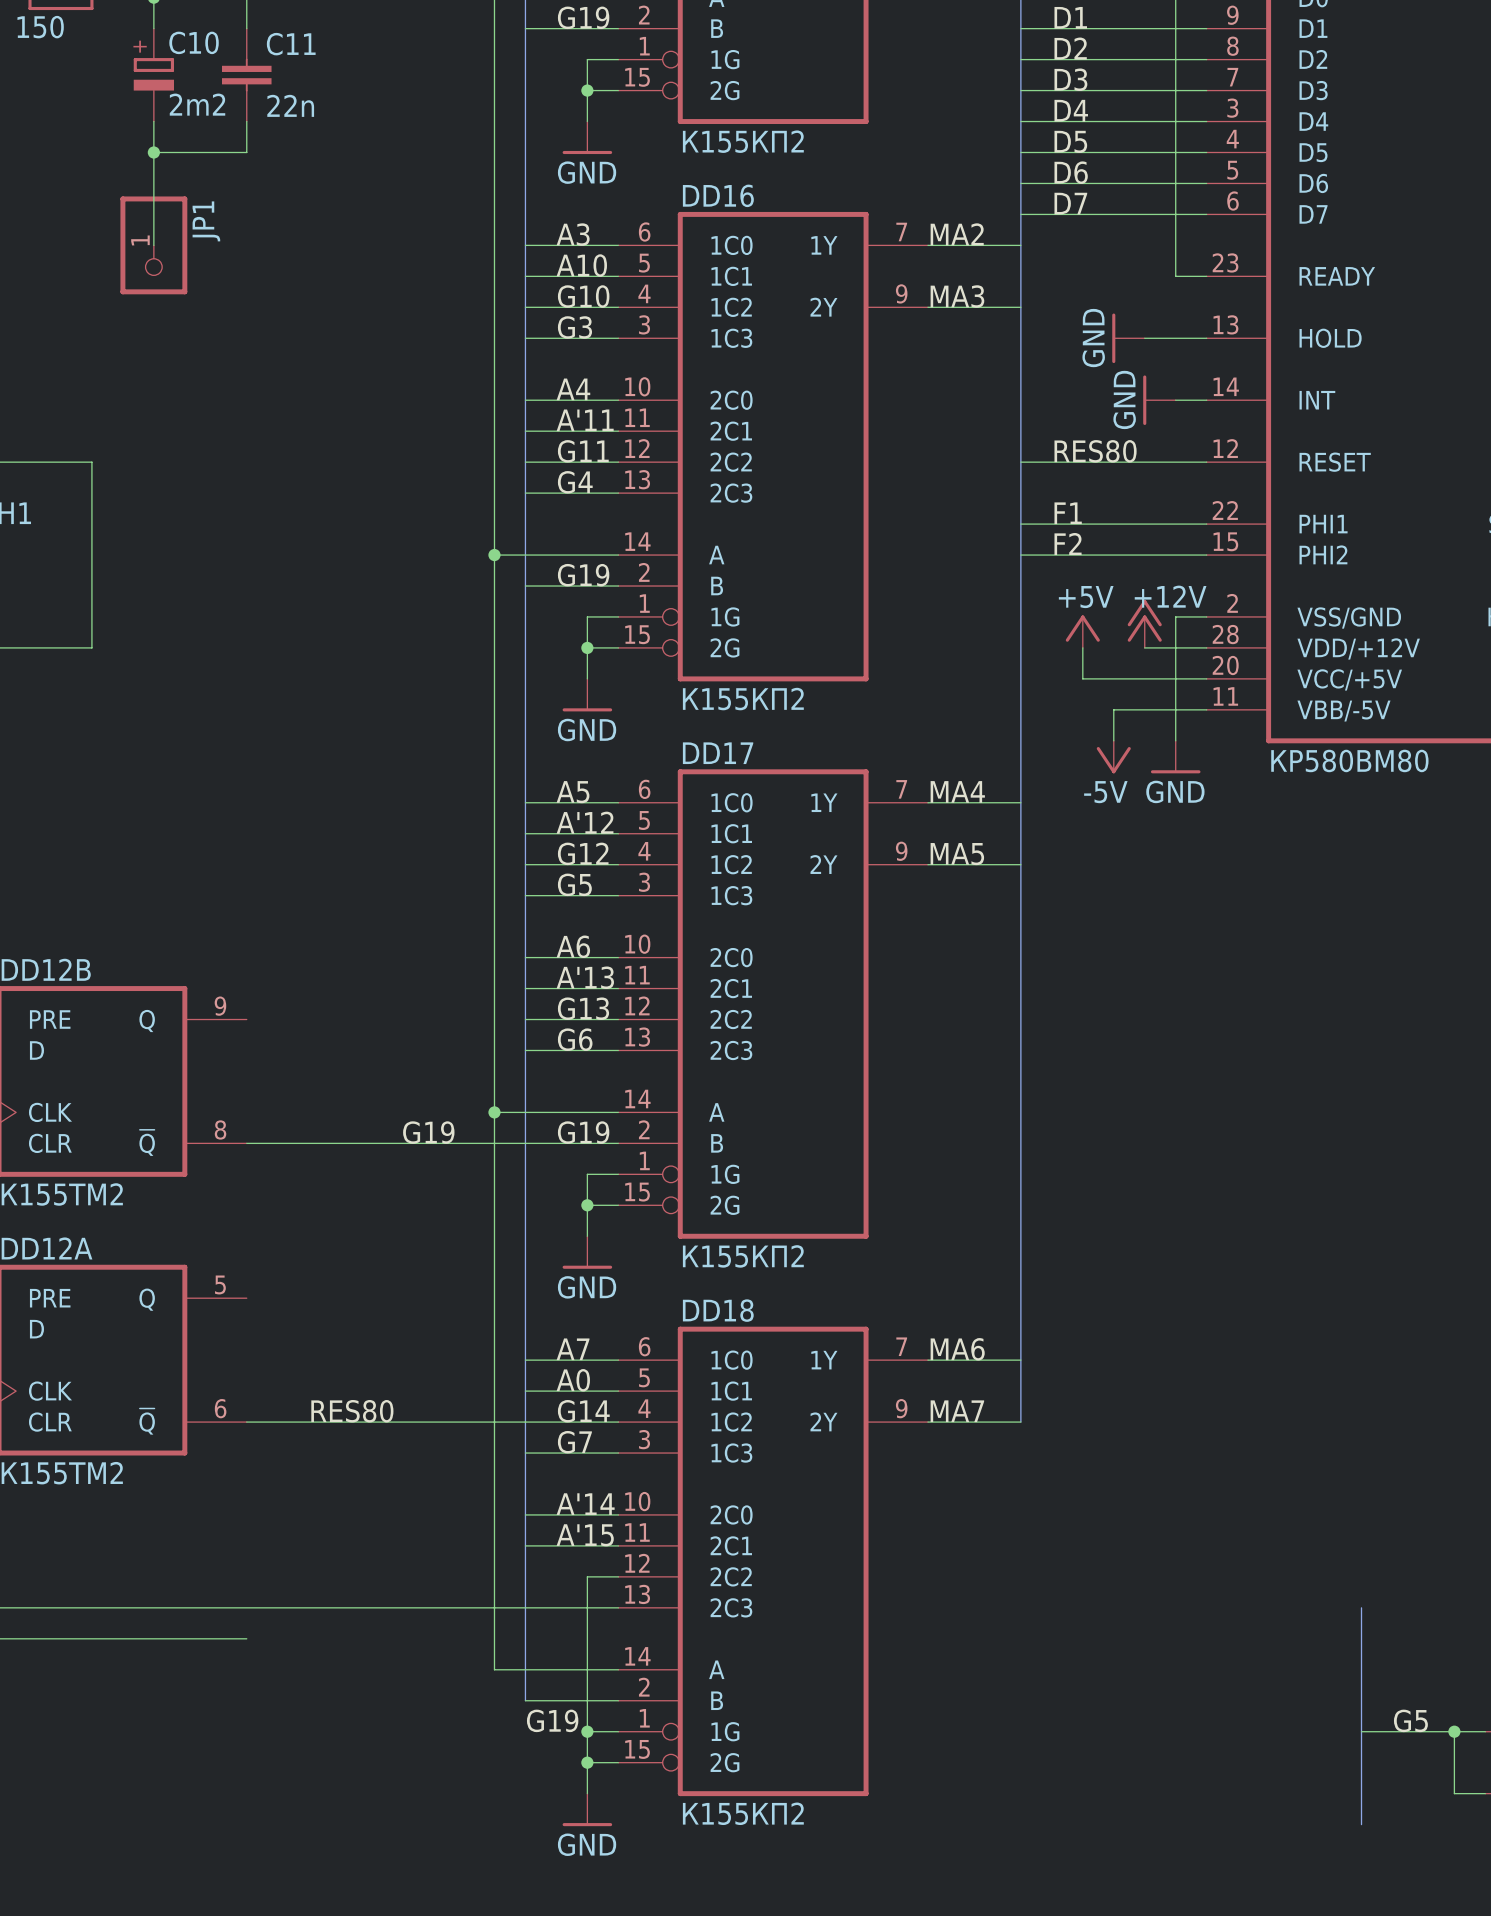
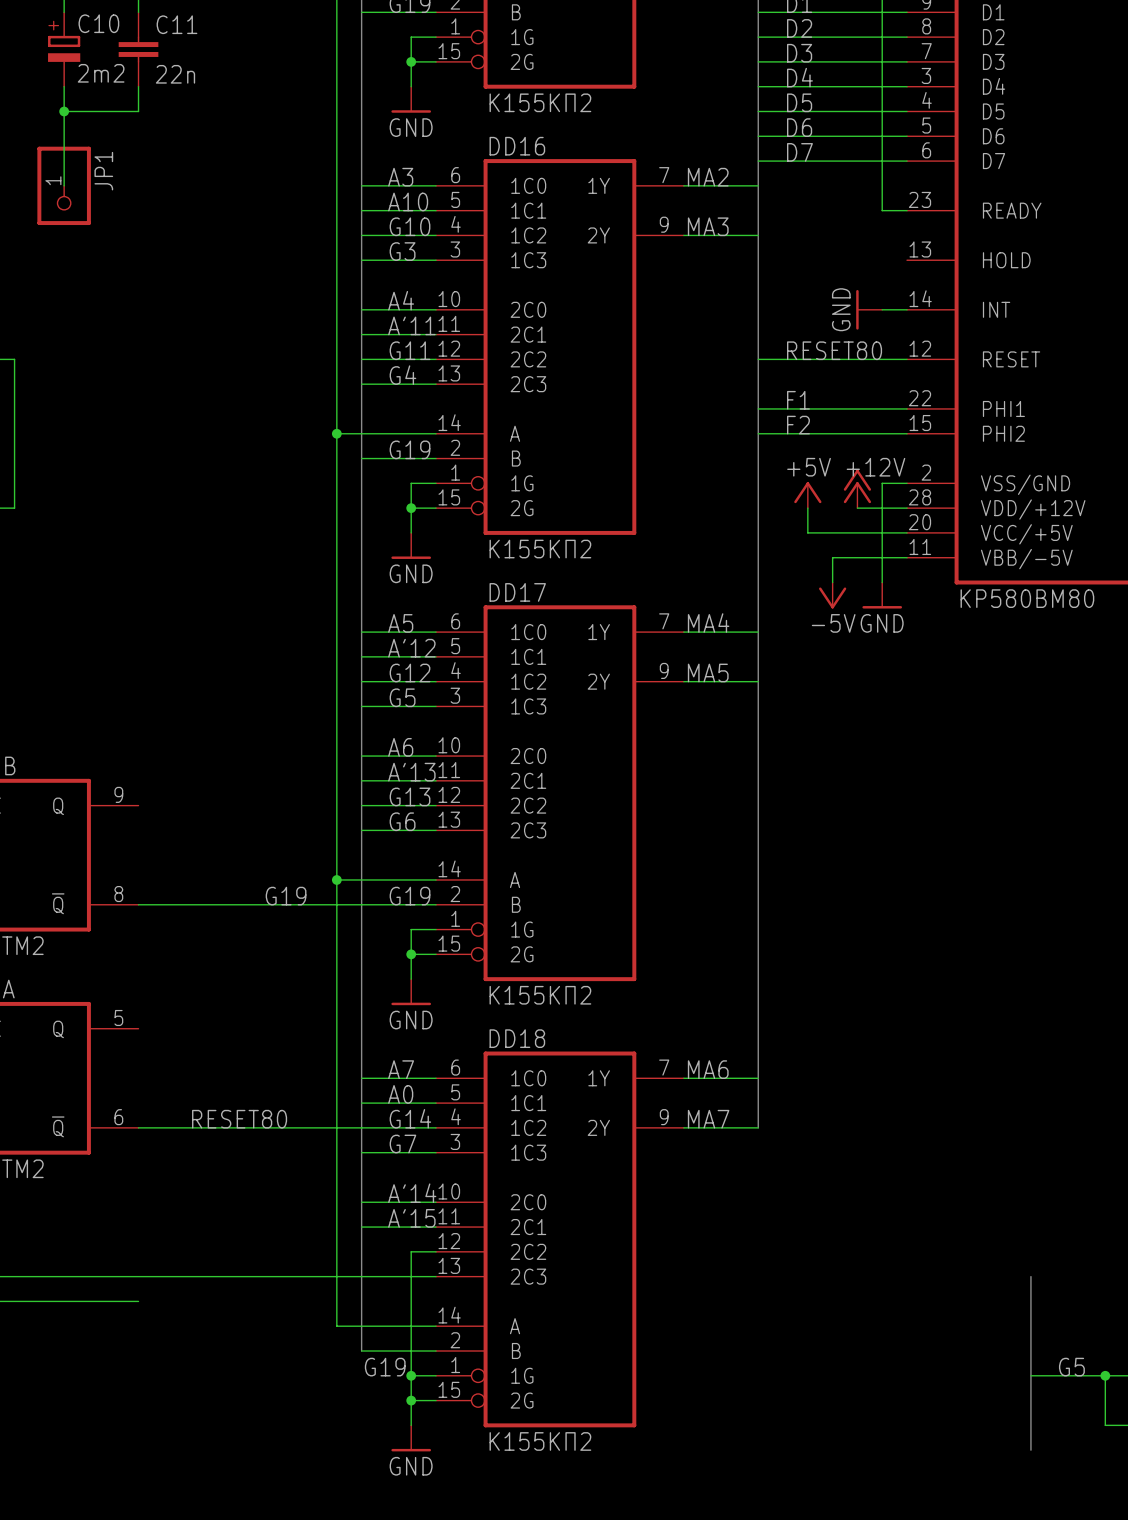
power symbol: GND (1128, 338) -> none
wire: (1144, 338) (1206, 338) -> none
label: RES80 (1095, 451) -> RESET80 (834, 350)
label: RES80 (352, 1411) -> RESET80 (239, 1119)

